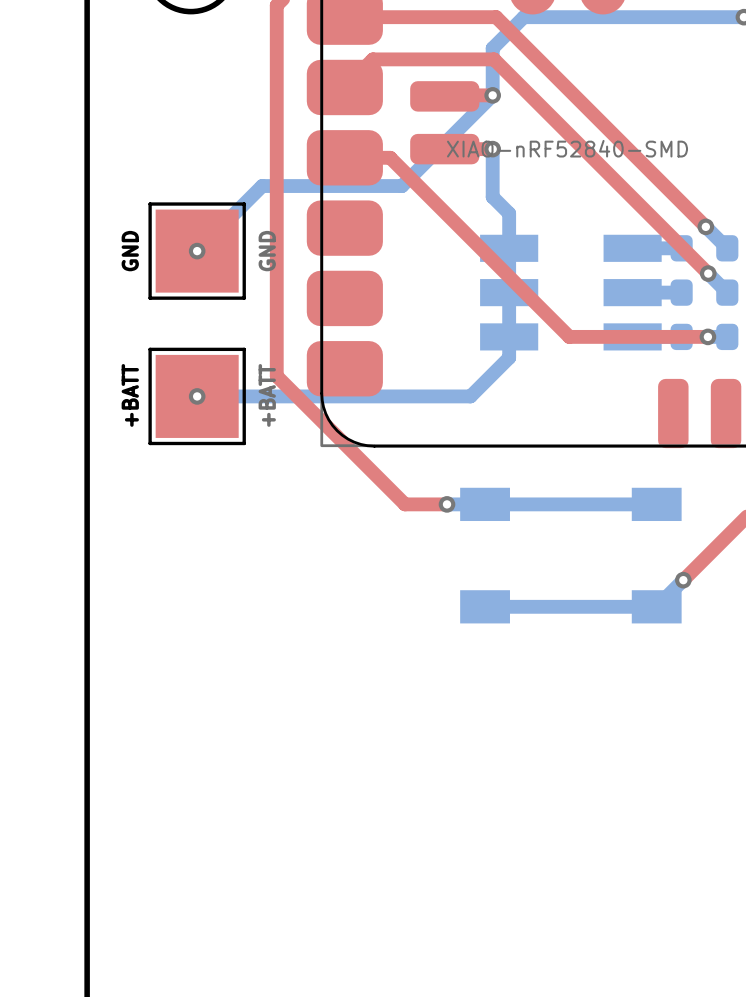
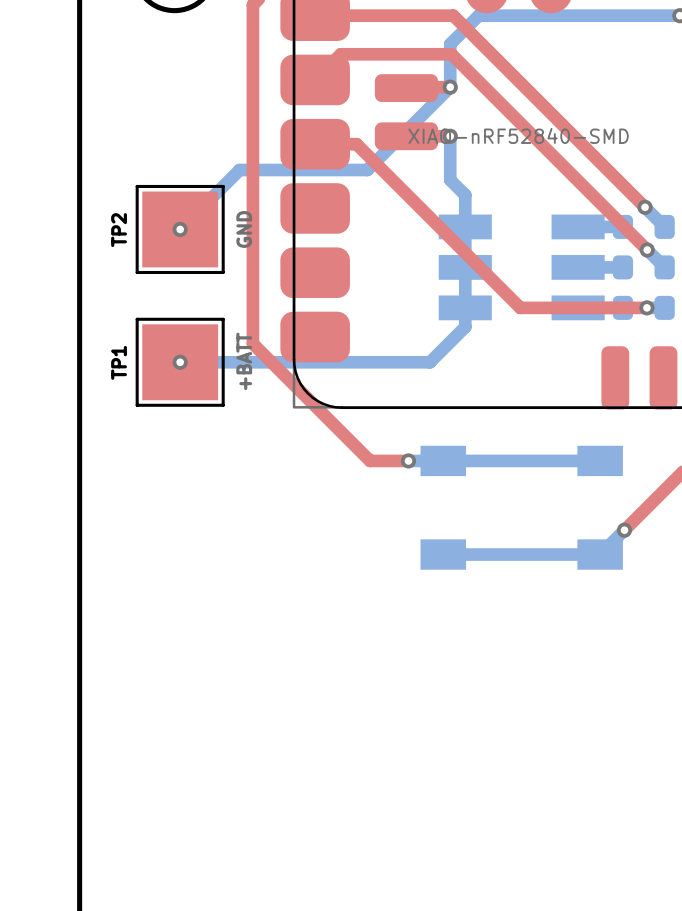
GND name: GND (130, 251) -> TP2 (119, 230)
+BATT name: +BATT (130, 395) -> TP1 (119, 362)

